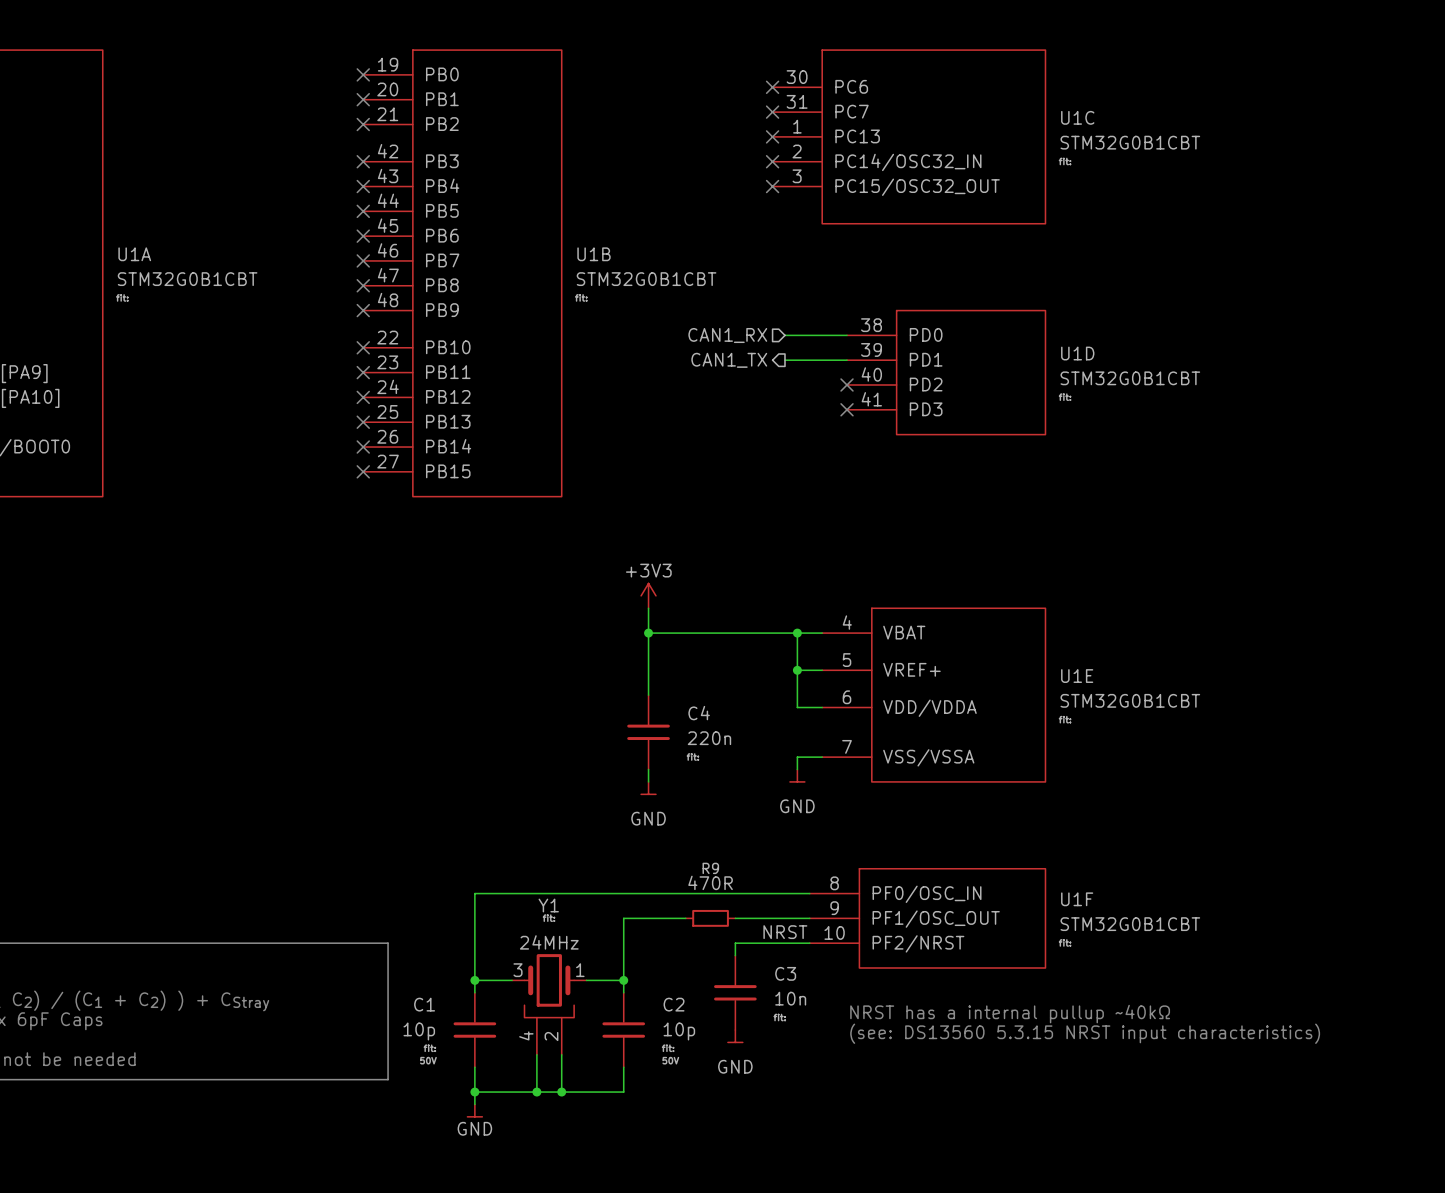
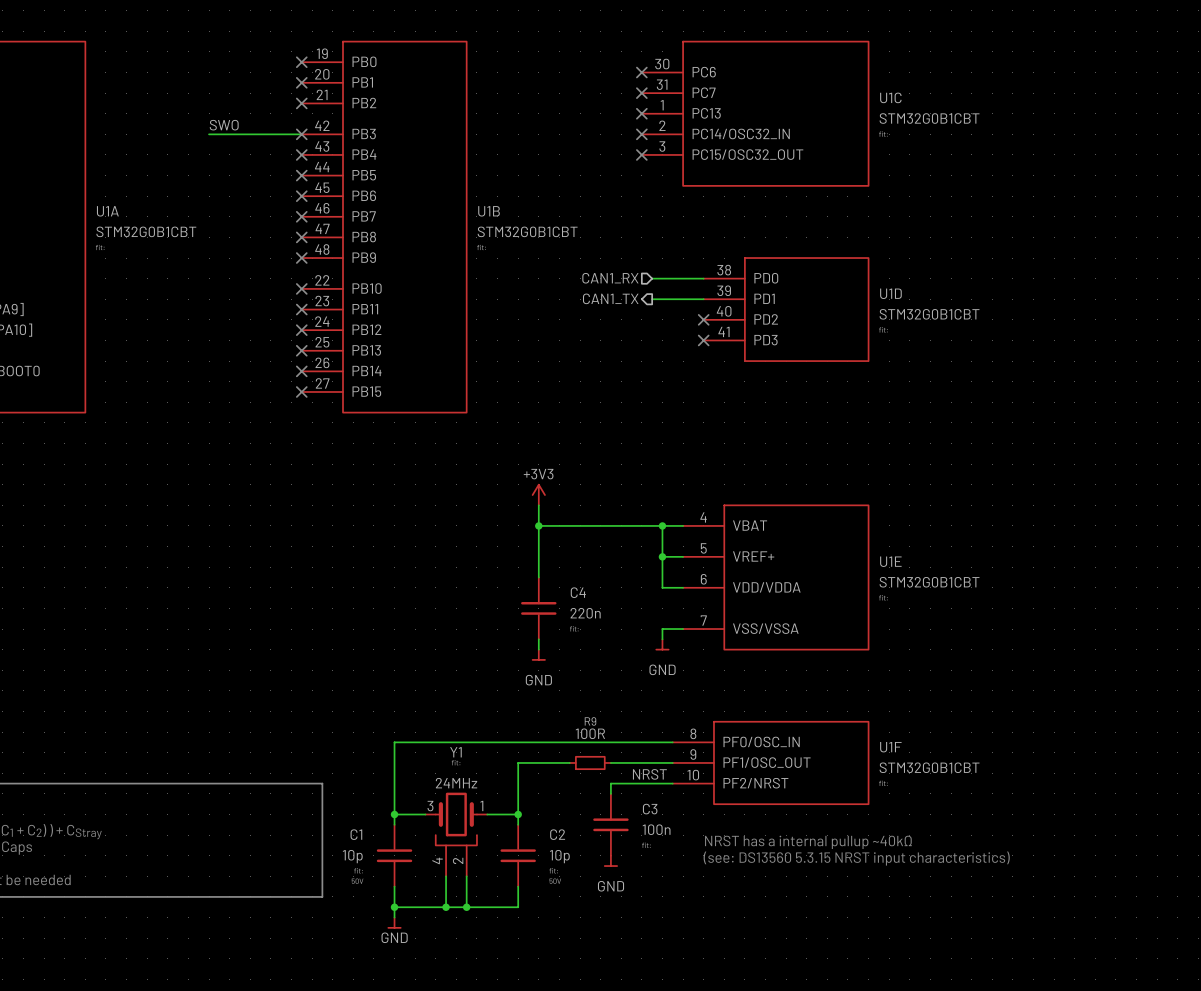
label: none -> SWO (224, 125)
wire: none -> (209, 134) (301, 134)
R9 value: 470R (710, 882) -> 100R (590, 733)
C3 value: 10n (790, 998) -> 100n (656, 829)

